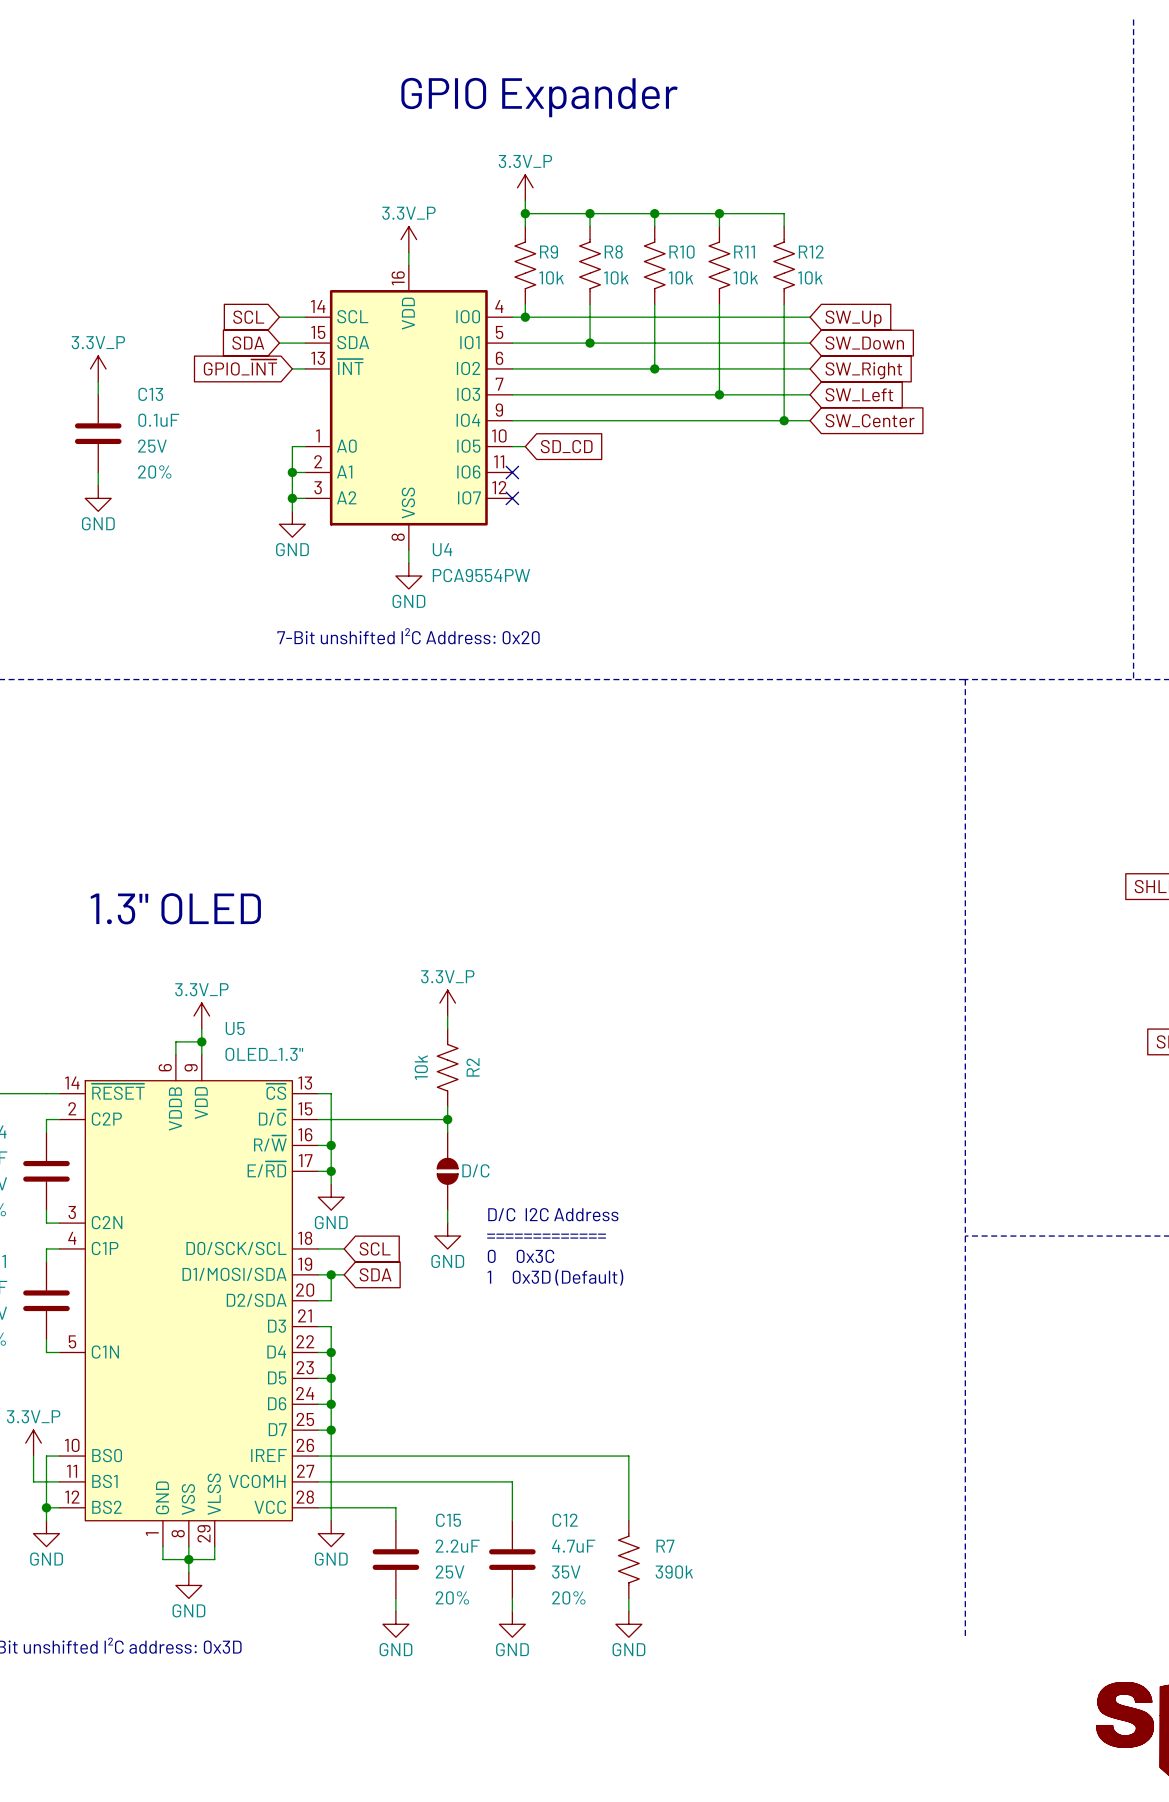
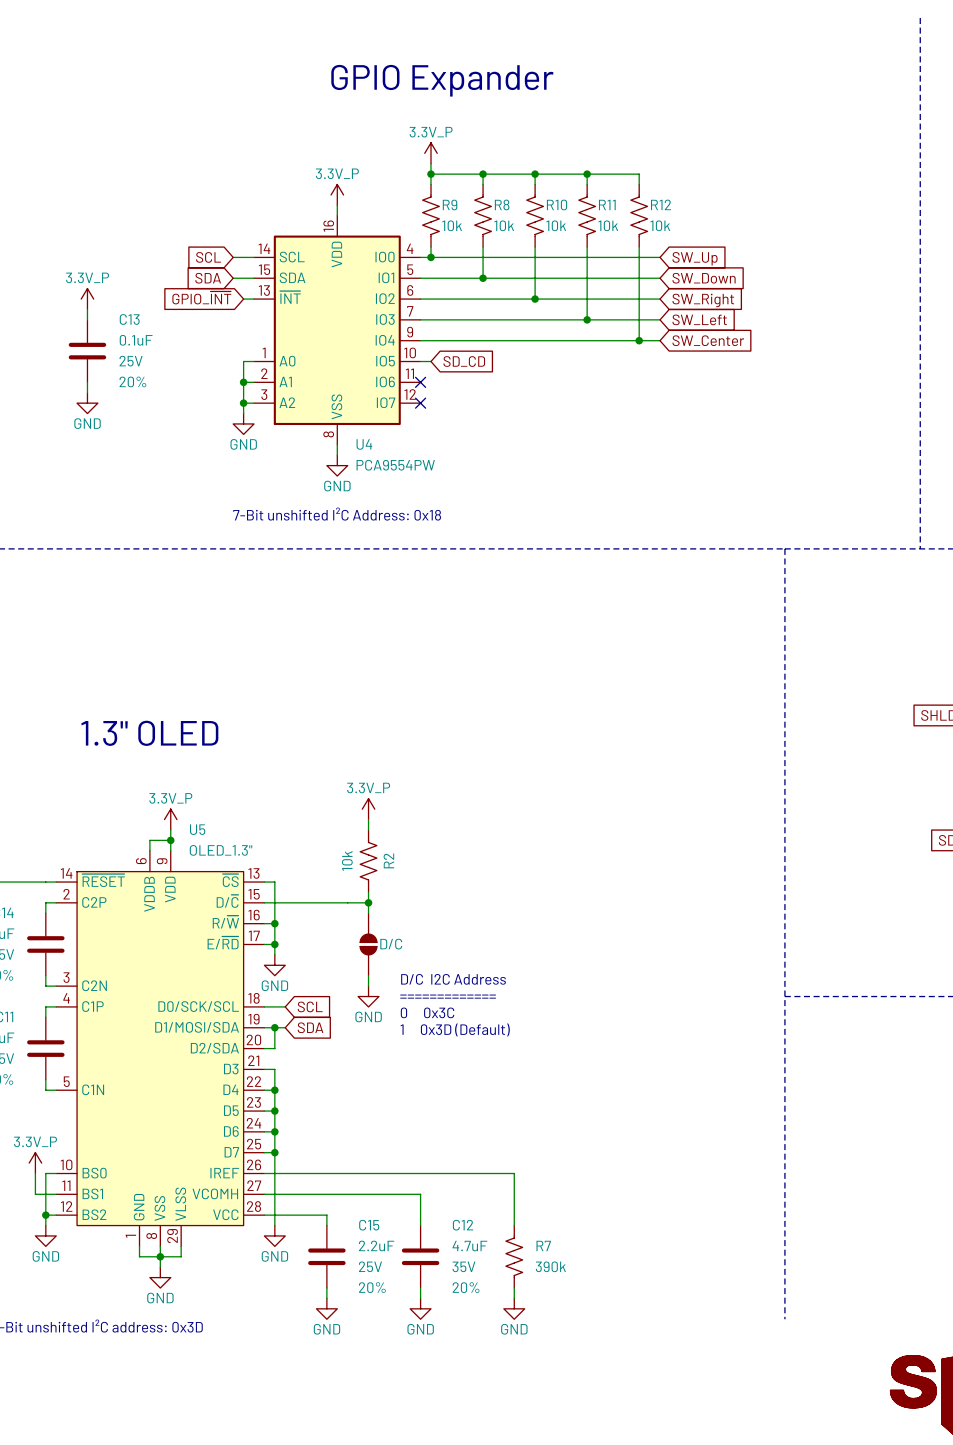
text: 7-Bit unshifted I²C Address: 0x20 (408, 636) -> 7-Bit unshifted I²C Address: 0x18 (337, 514)

